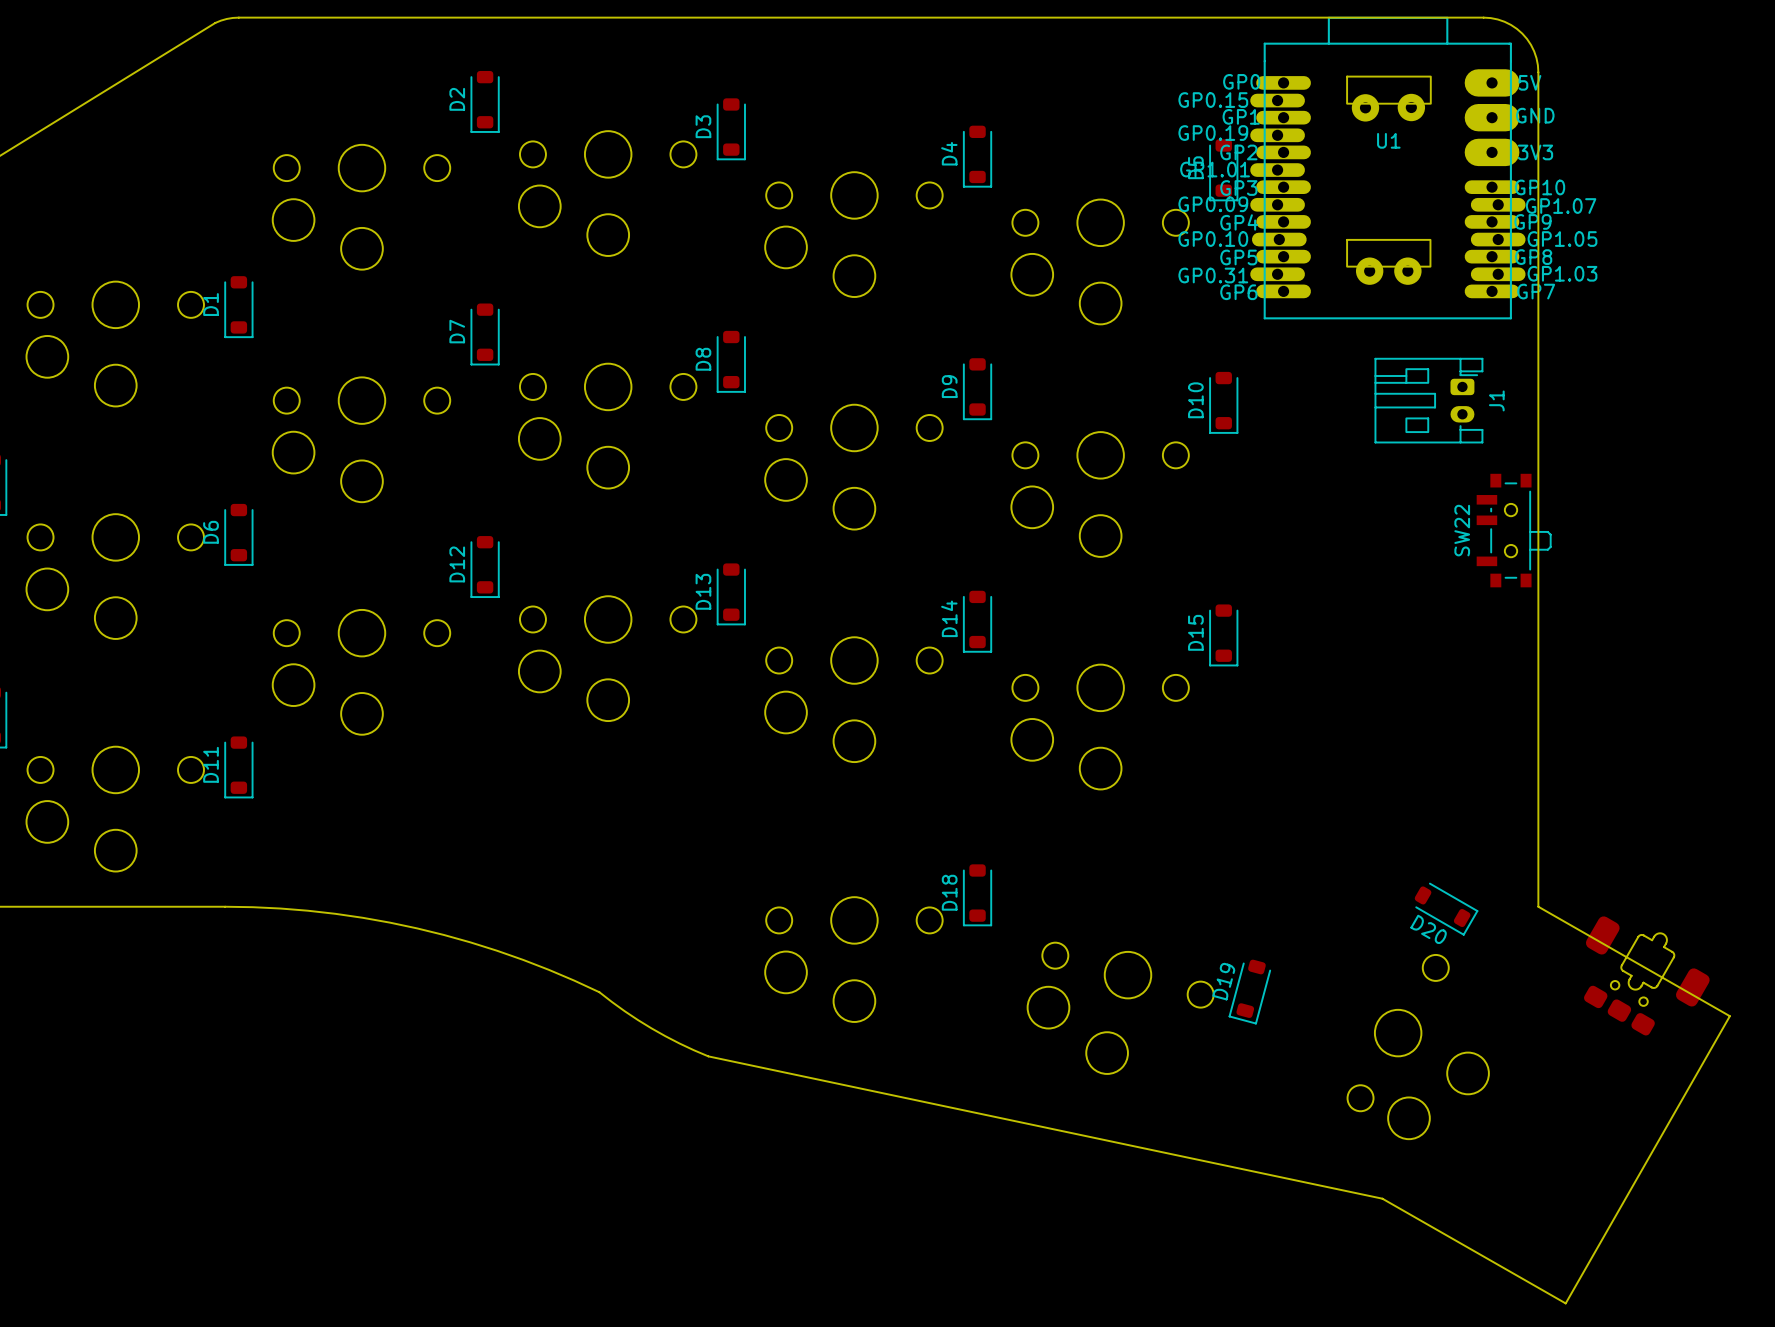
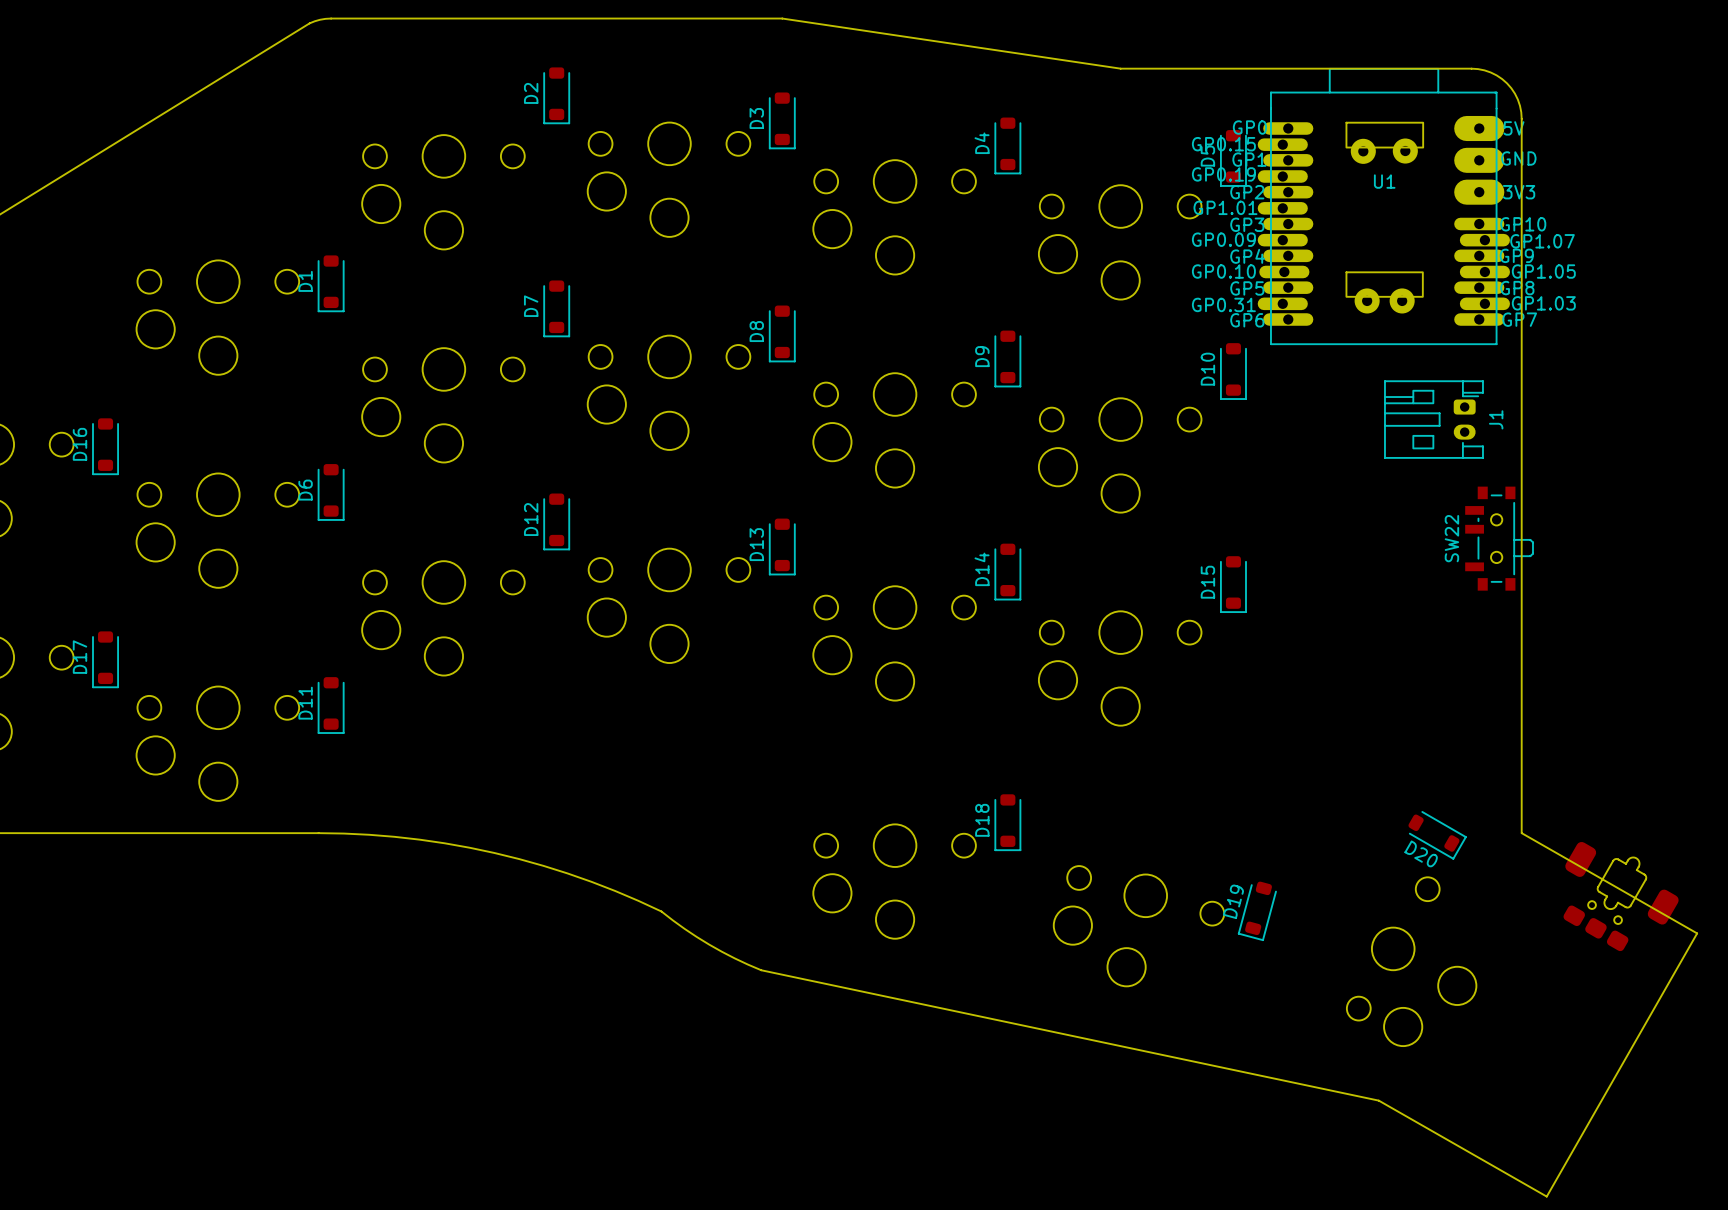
board edge: (731, 17) (1490, 18) (1504, 21) (1516, 28) (1527, 39) (1534, 51) (1538, 72) (1538, 127) -> (782, 18) (1120, 68) (1478, 69) (1490, 72) (1507, 83) (1517, 99) (1521, 118)
U1 position: (1387, 168) -> (1383, 206)
J1 position: (1428, 400) -> (1433, 419)
SW22 position: (1514, 530) -> (1499, 538)

